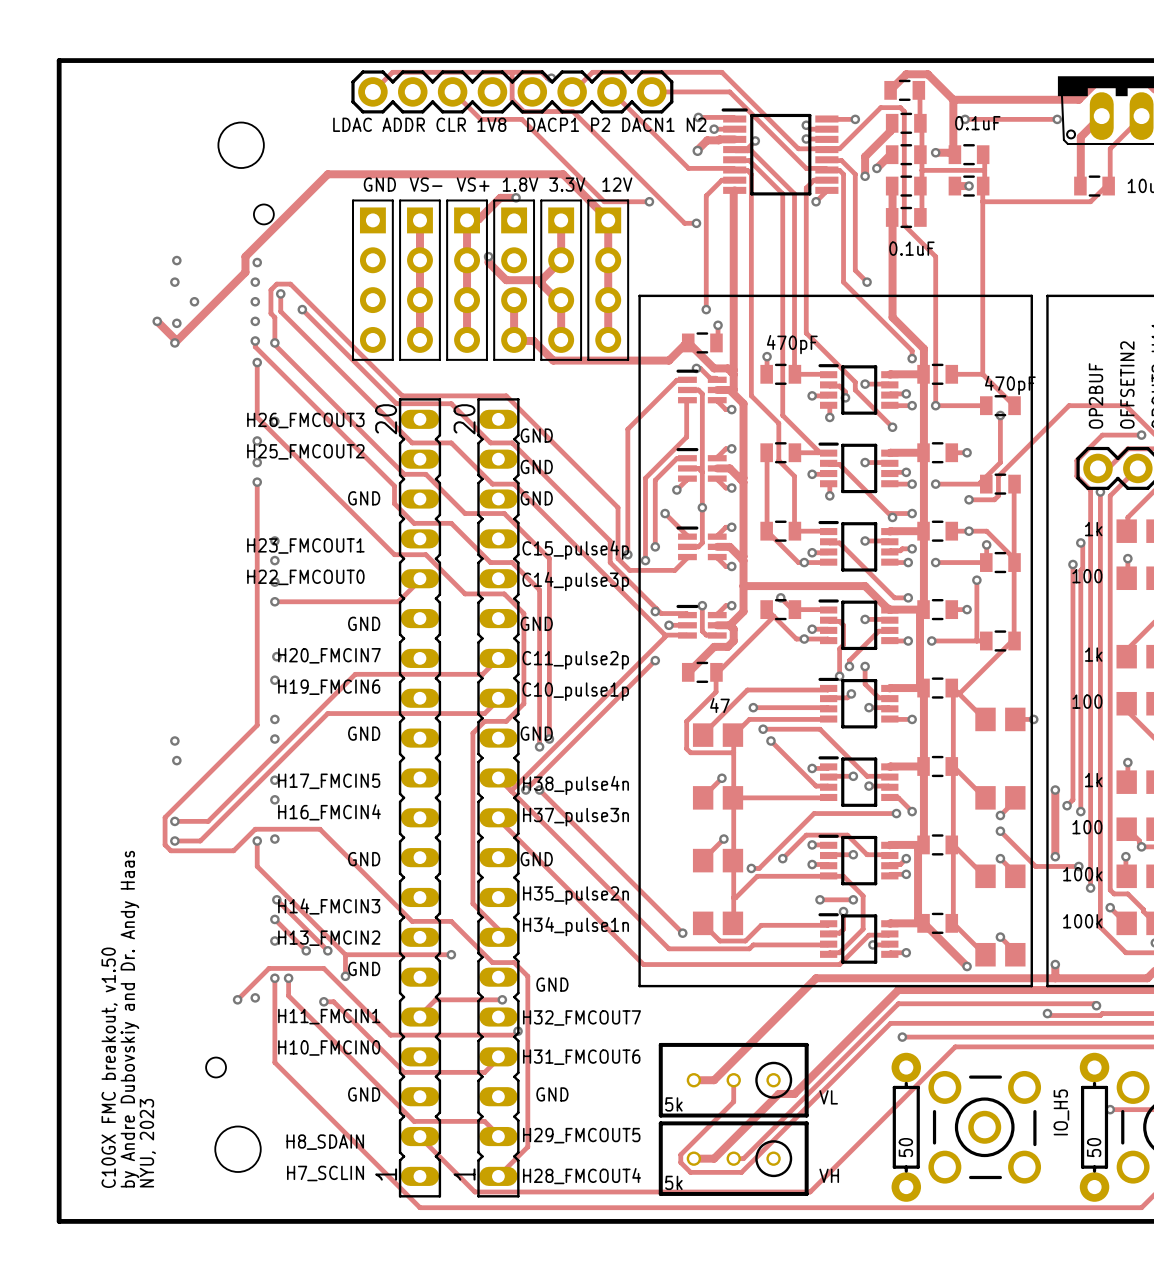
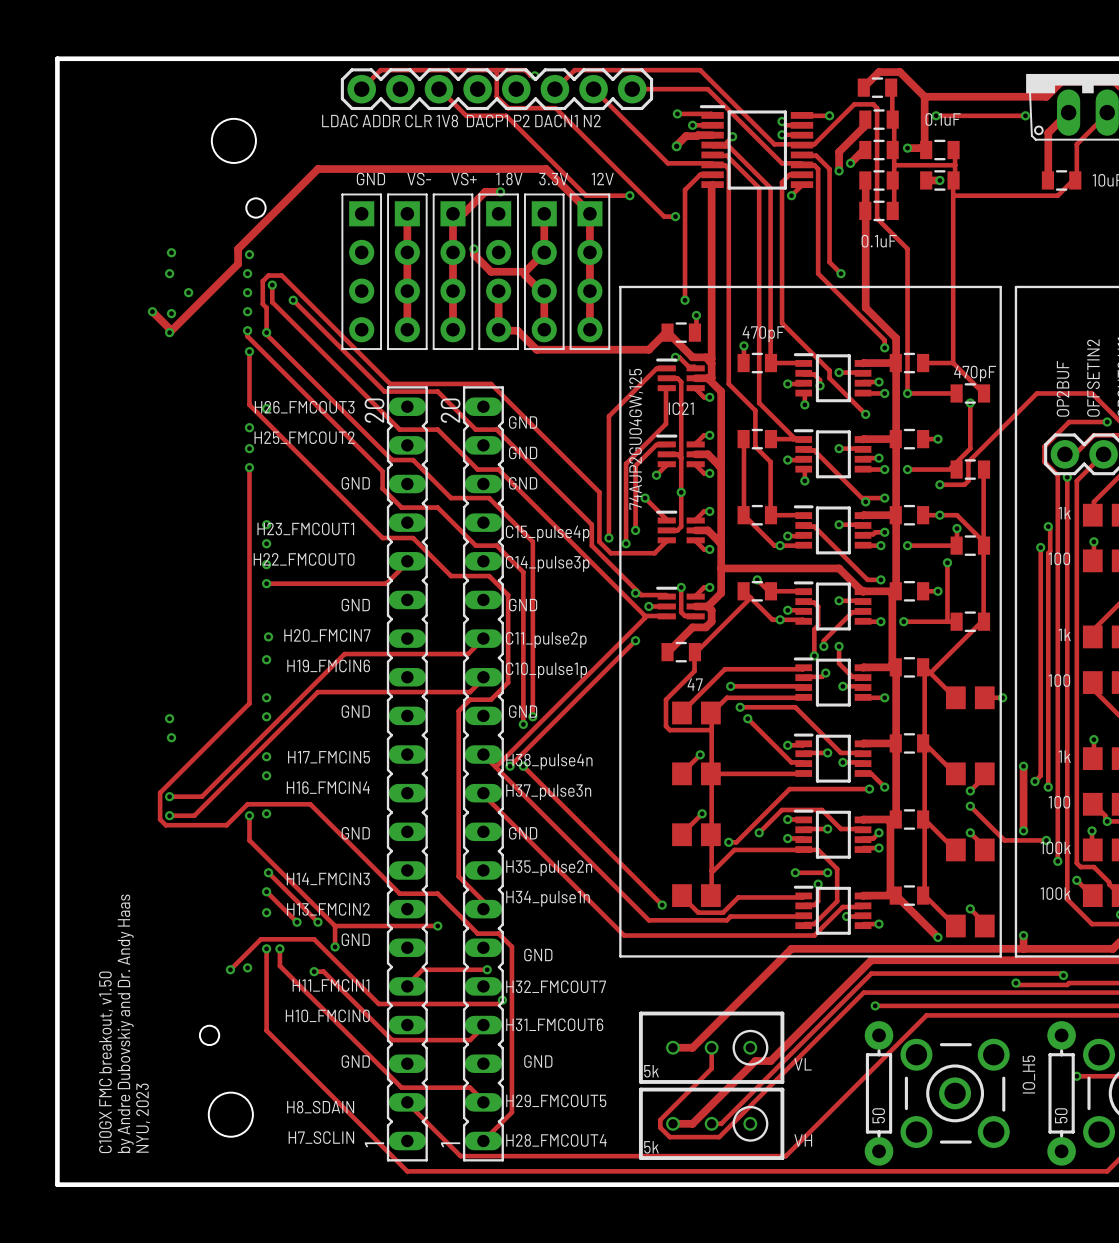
IC21 name: none -> IC21 (681, 408)
IC21 value: none -> 74AUP2GU04GW,125 (636, 439)

